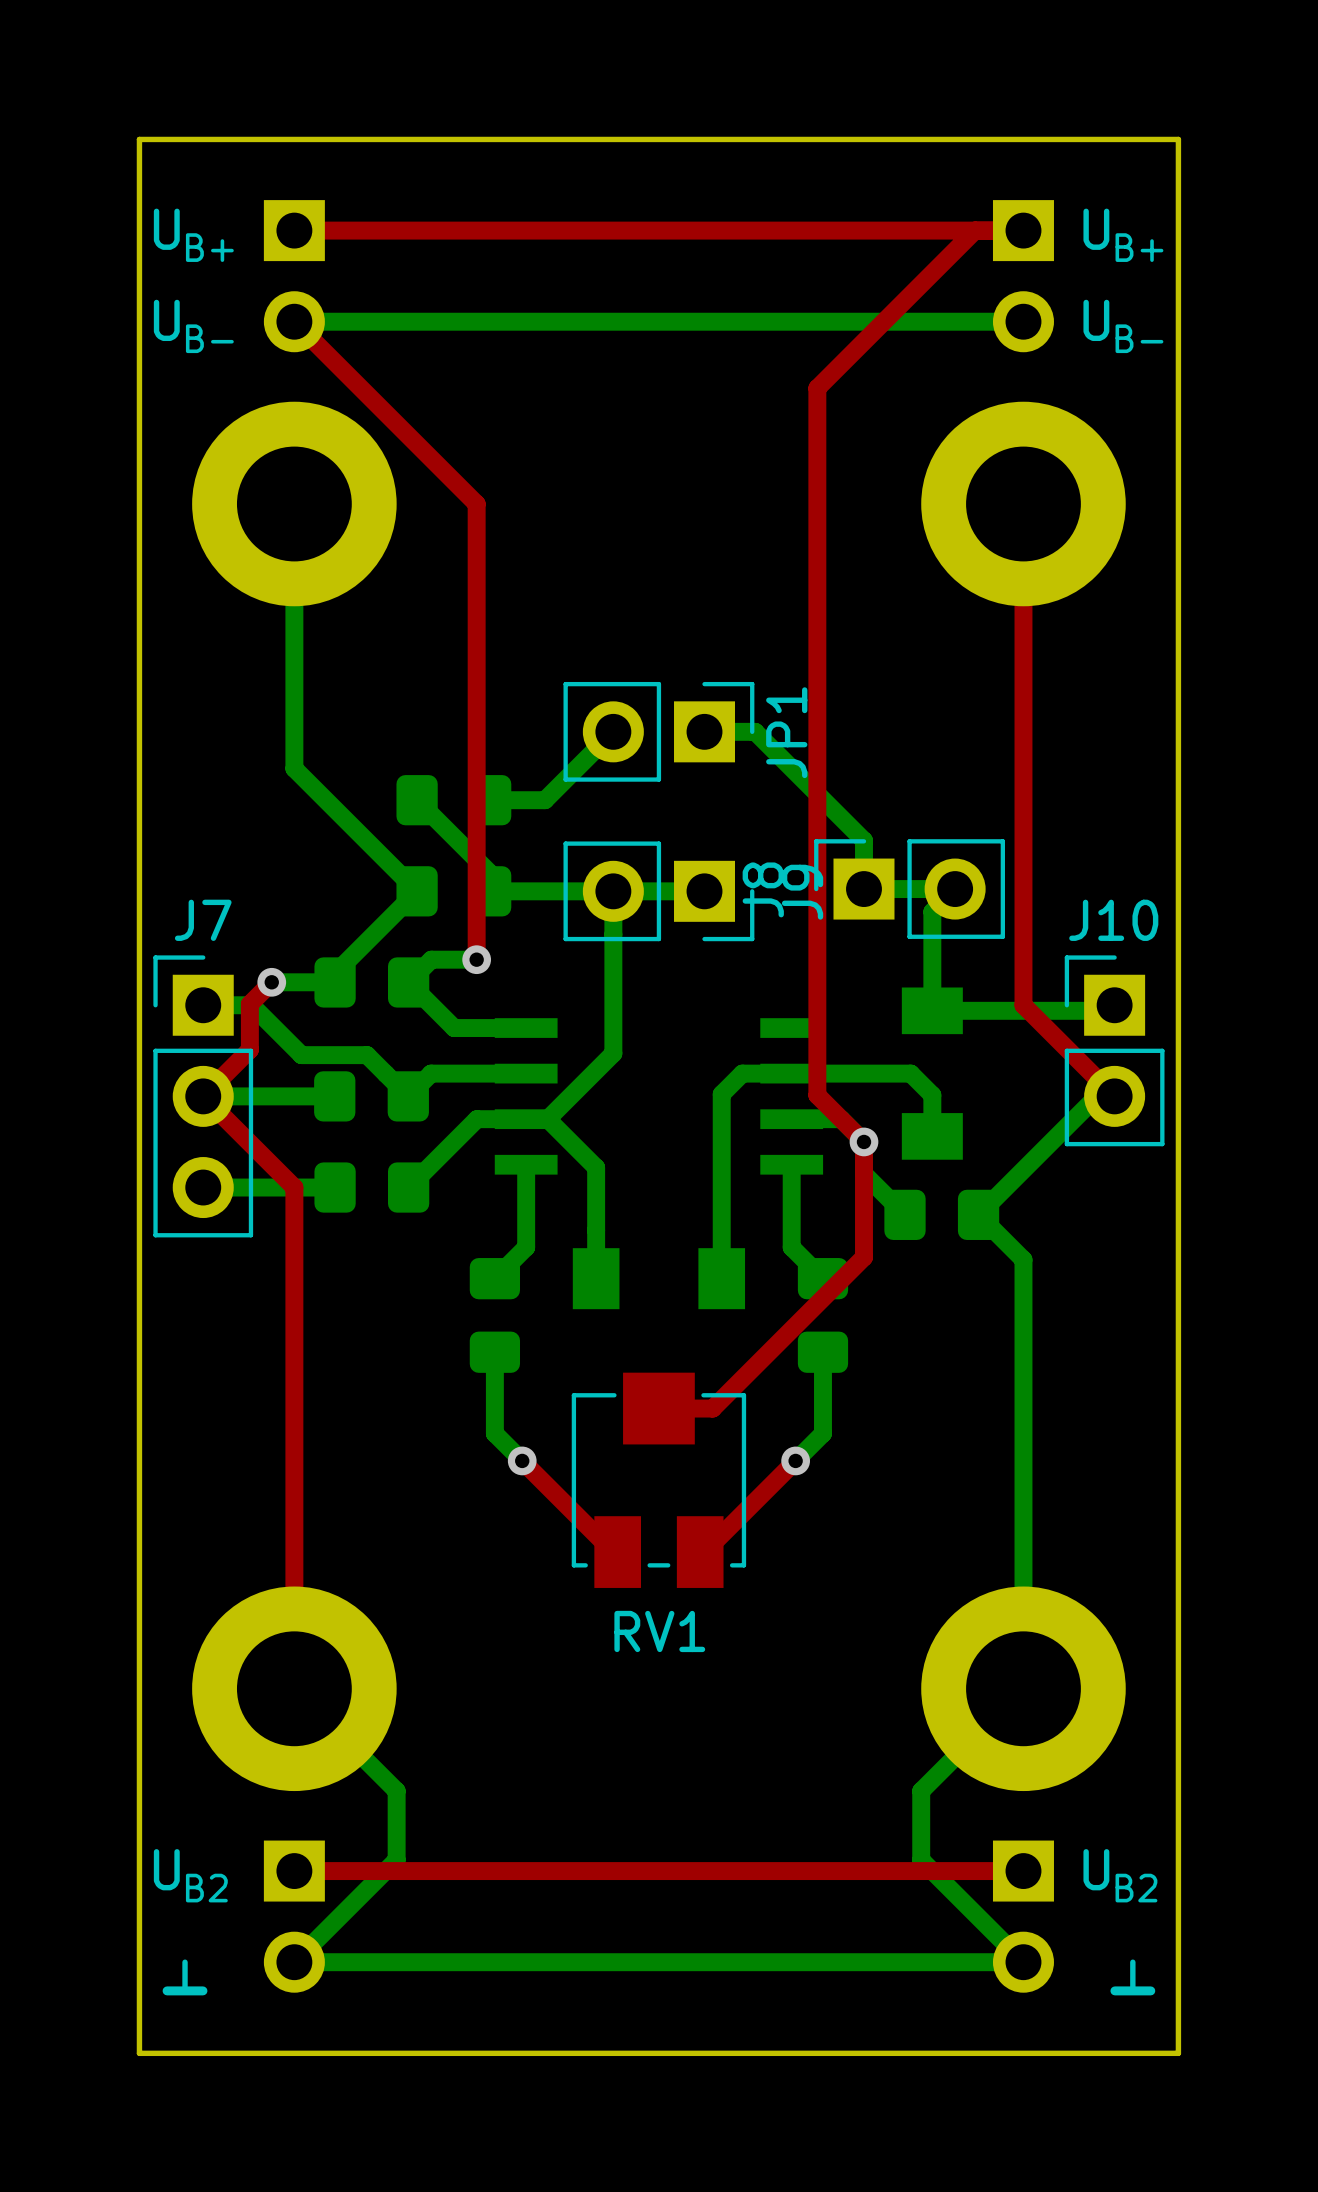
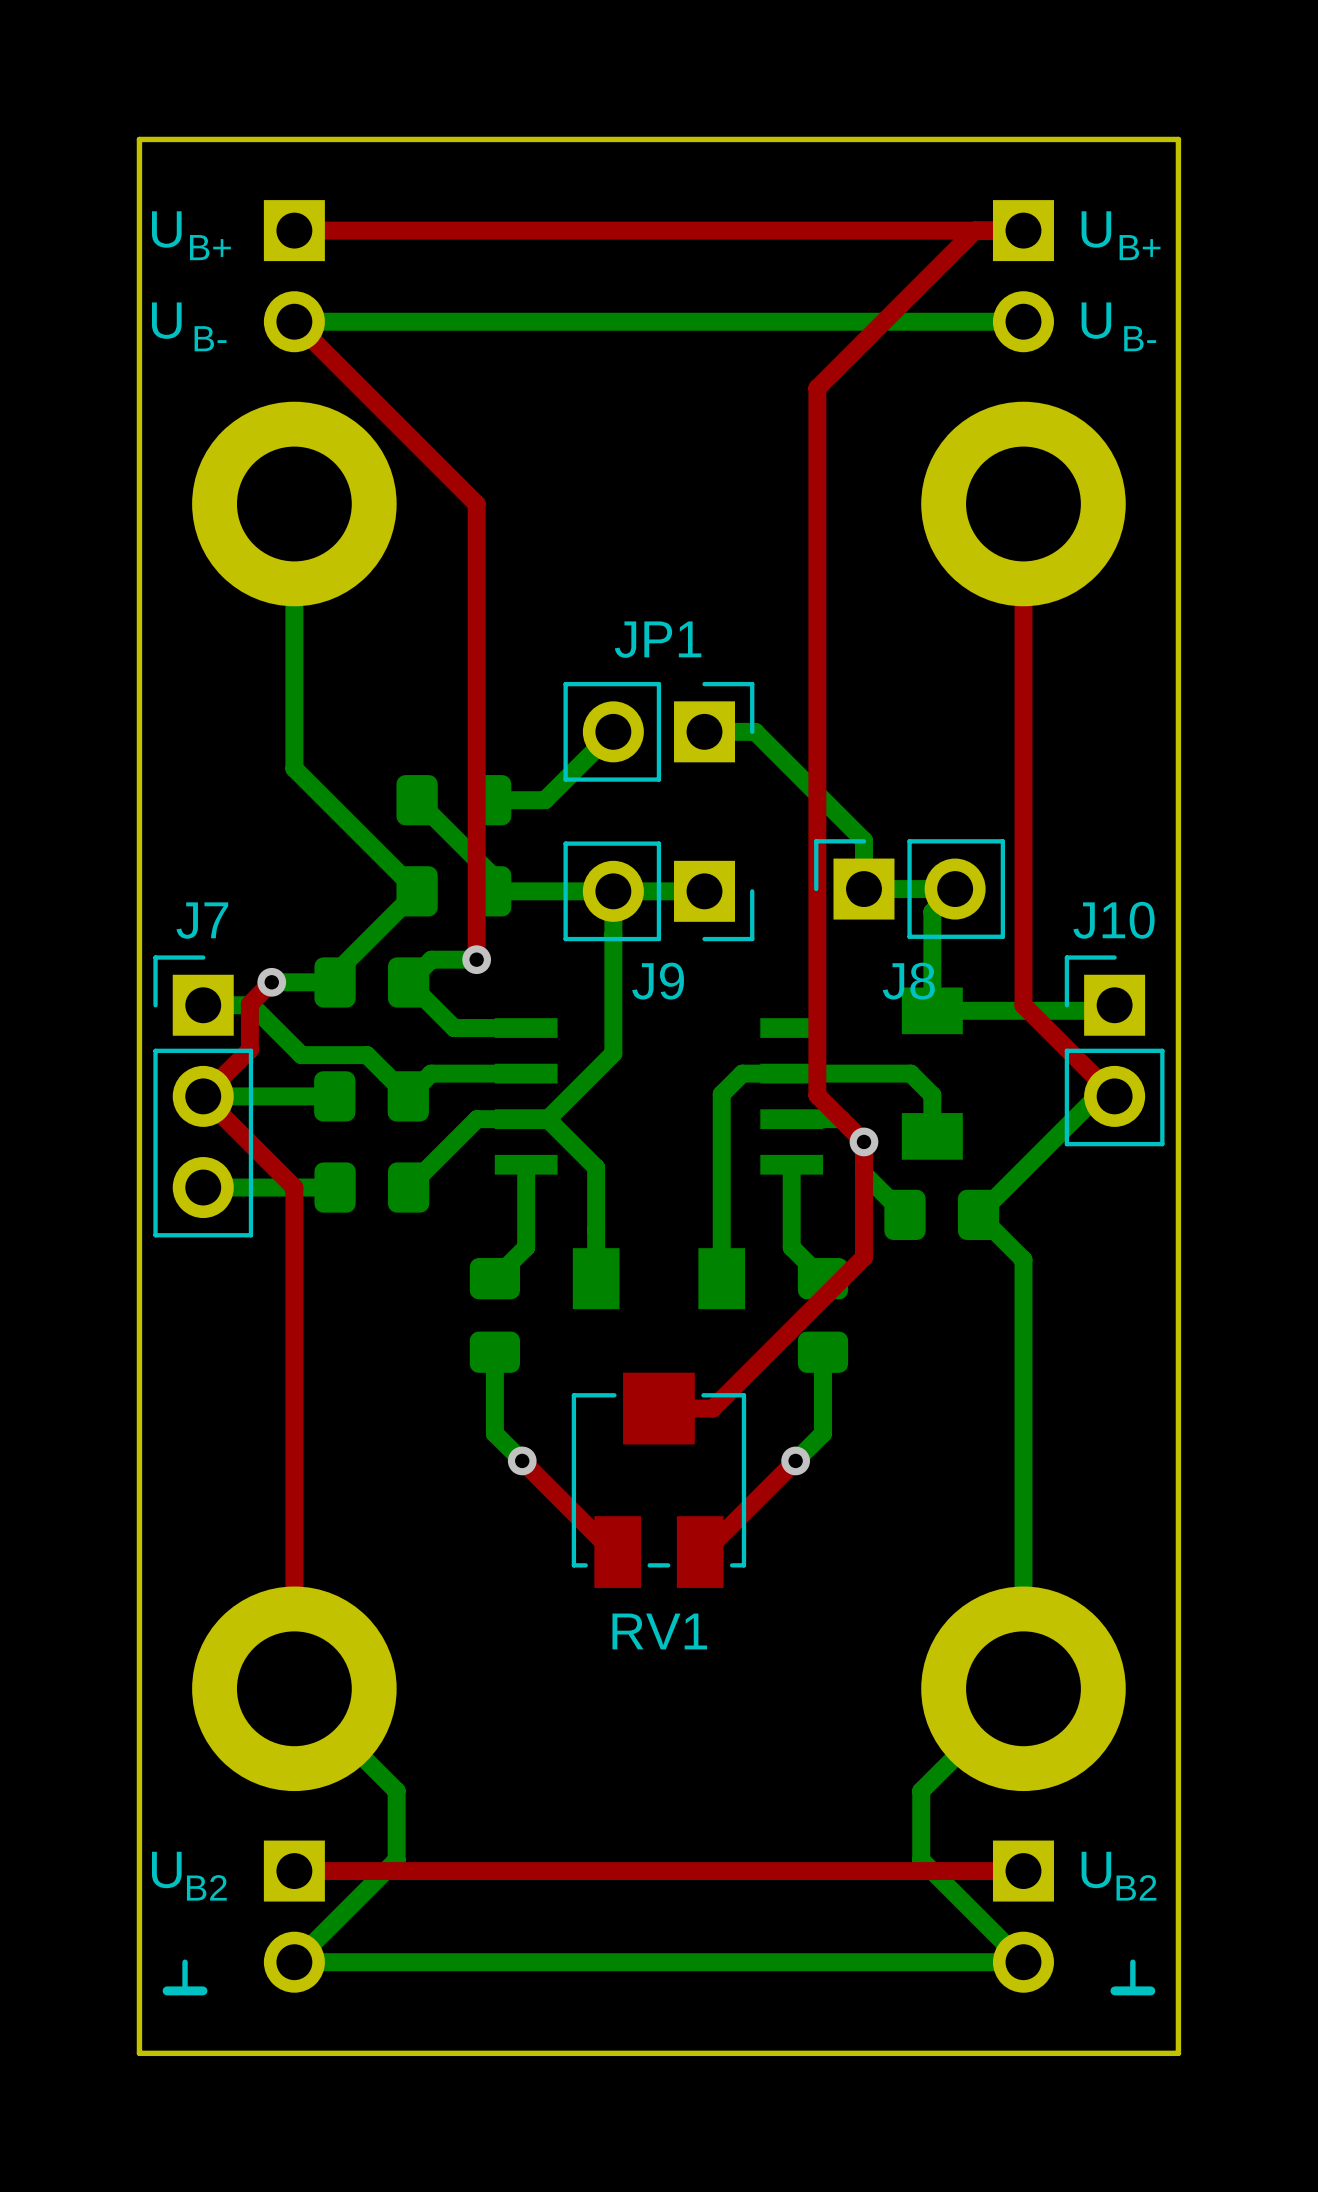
JP1 name rotation: 0° (786, 732) -> 90° clockwise (658, 639)
JP1 name position: JP1 (786, 732) -> JP1 (658, 639)
J8 name rotation: 0° (763, 889) -> 90° clockwise (908, 981)
J8 name position: J8 (763, 889) -> J8 (908, 981)
J9 name rotation: 0° (802, 892) -> 90° clockwise (658, 981)
J9 name position: J9 (802, 892) -> J9 (658, 981)

